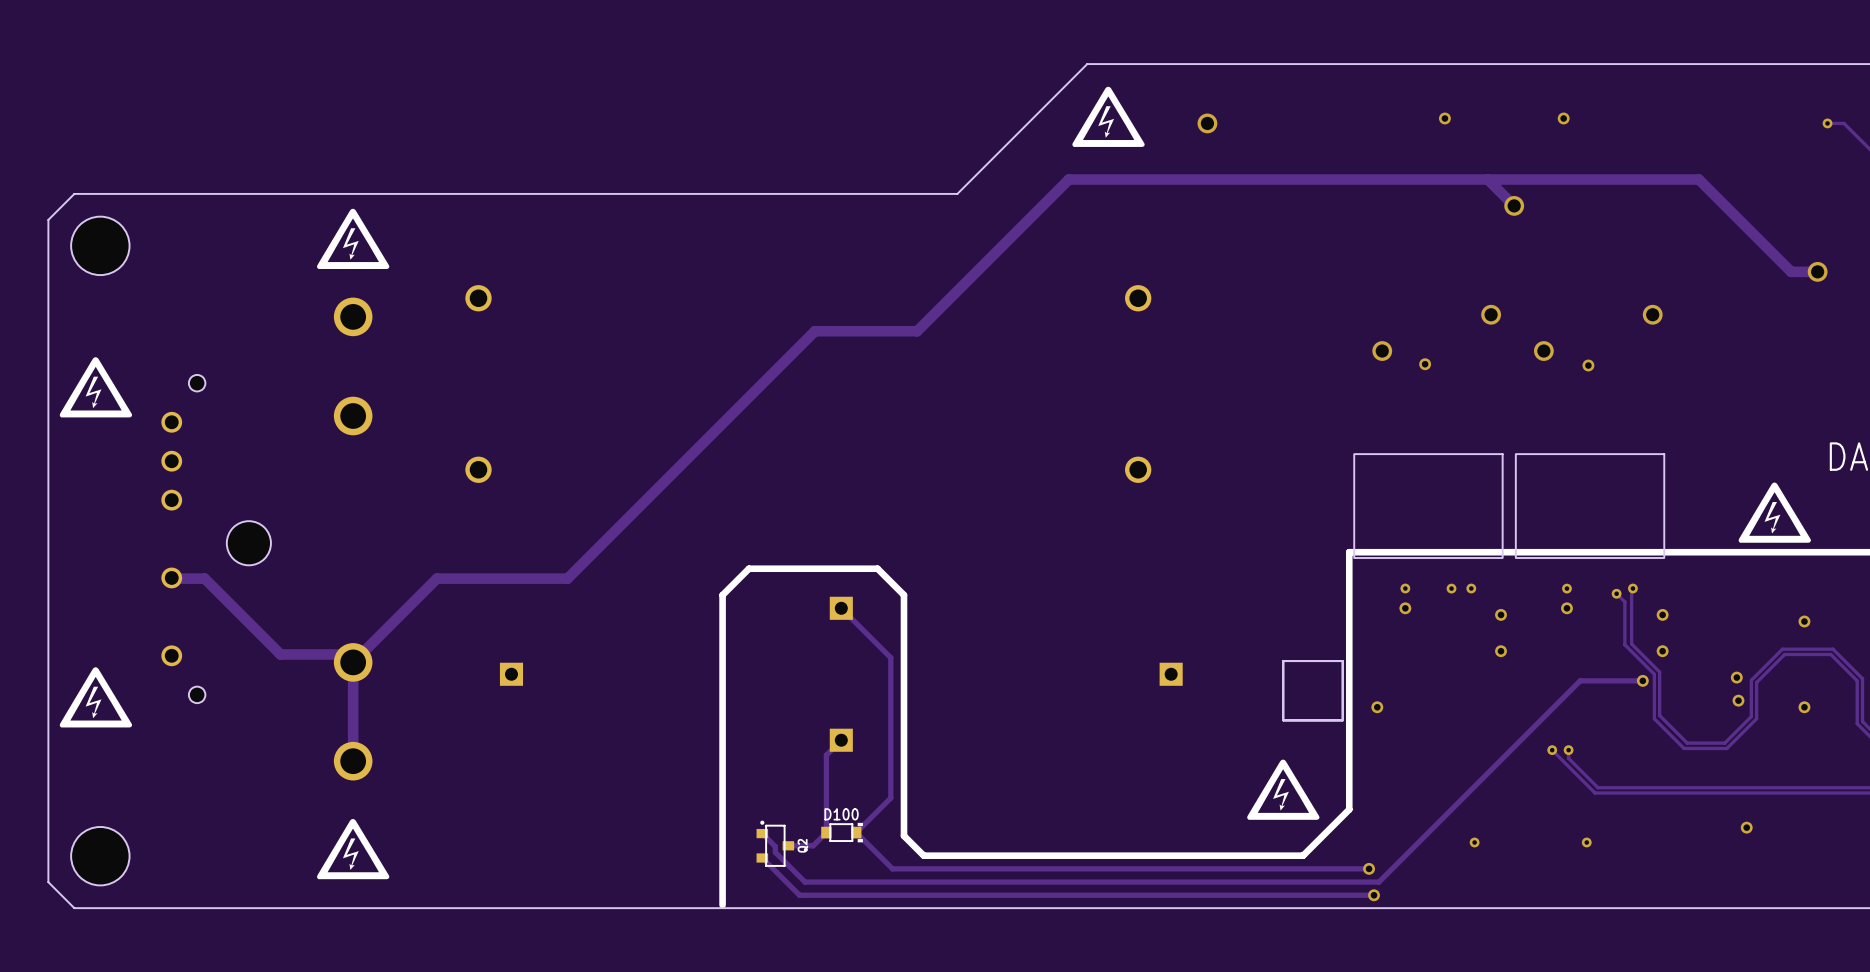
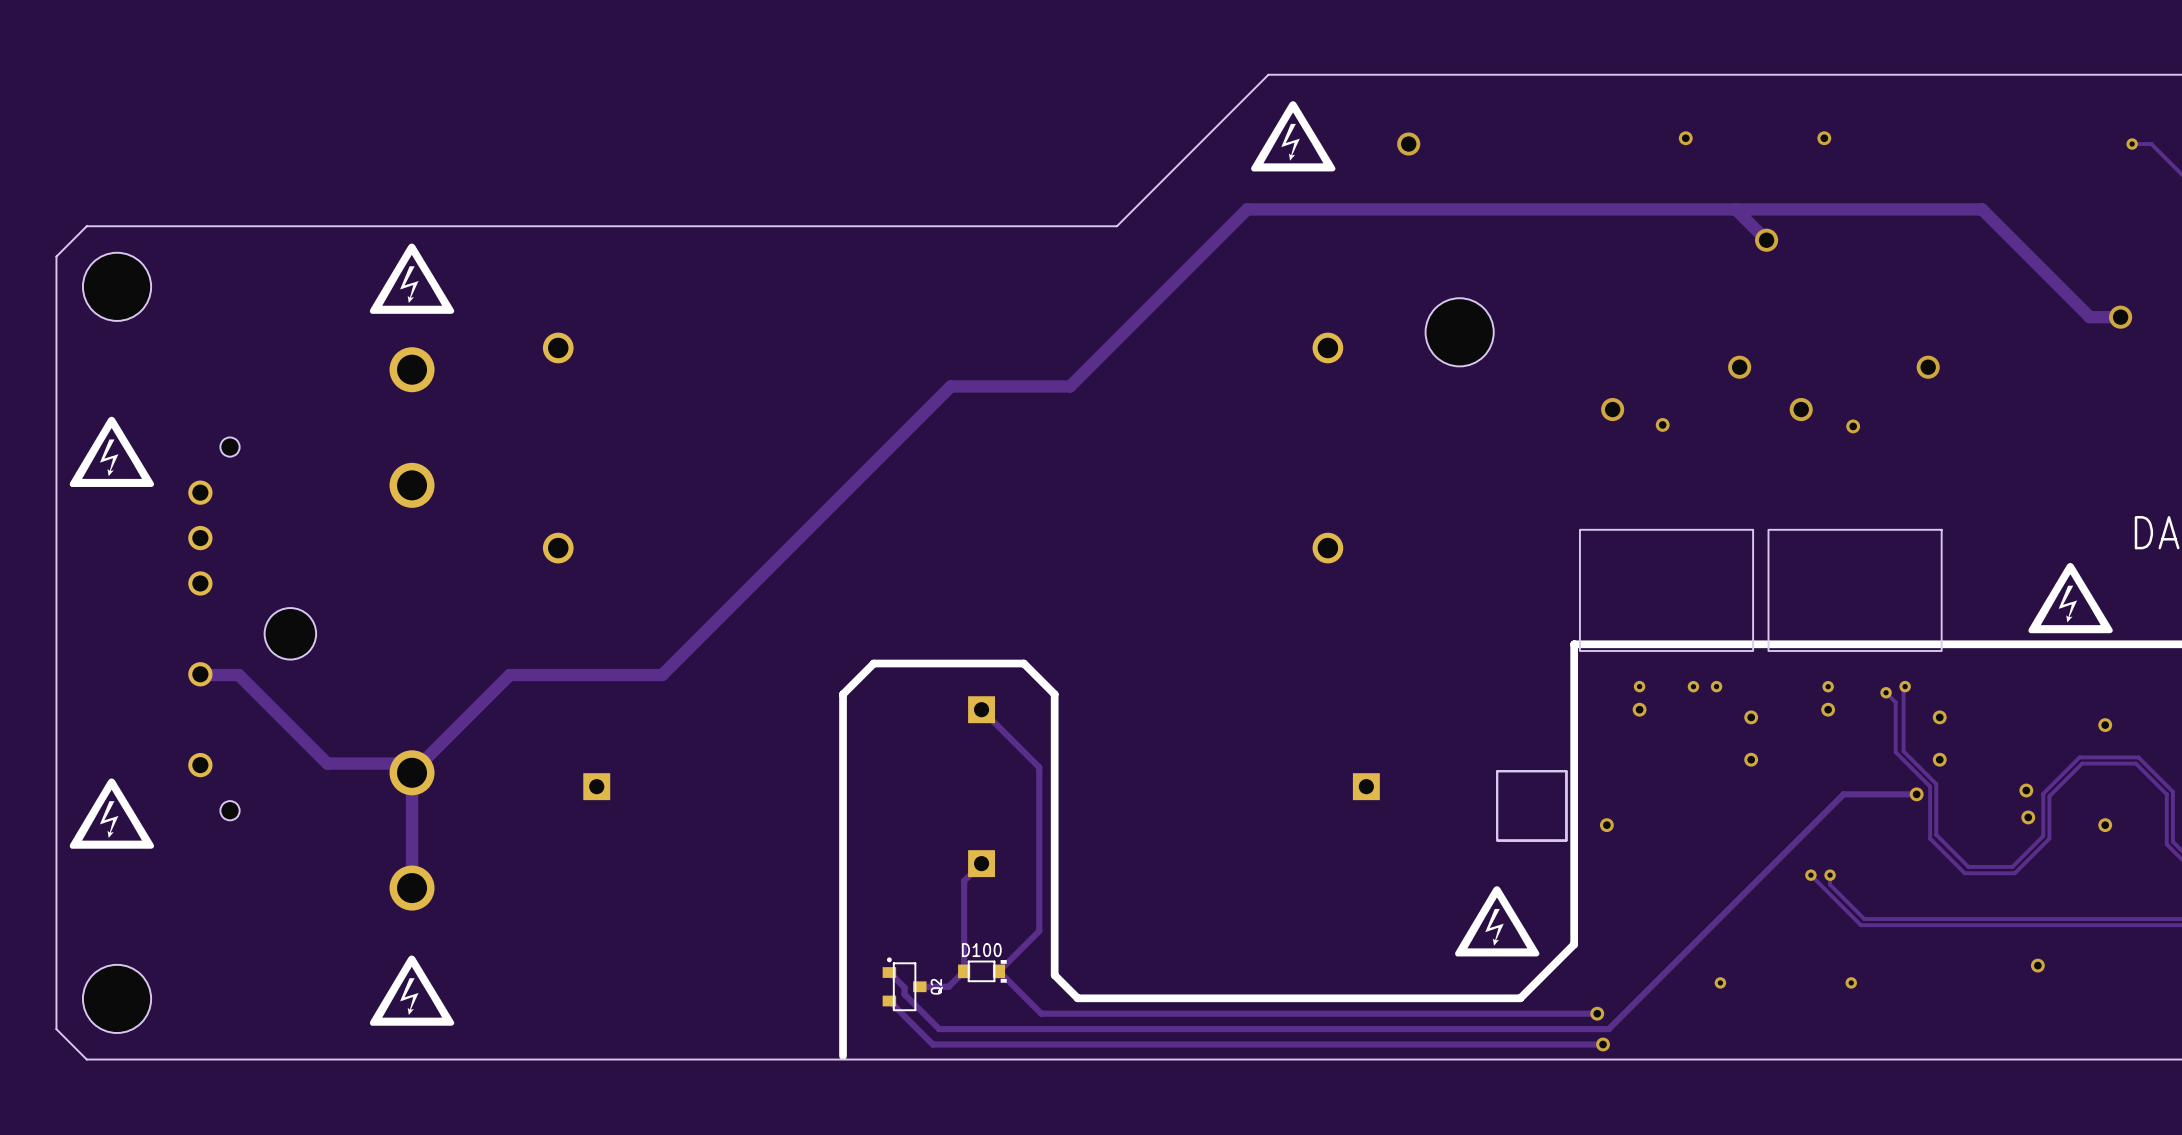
part: none -> (1459, 332)

